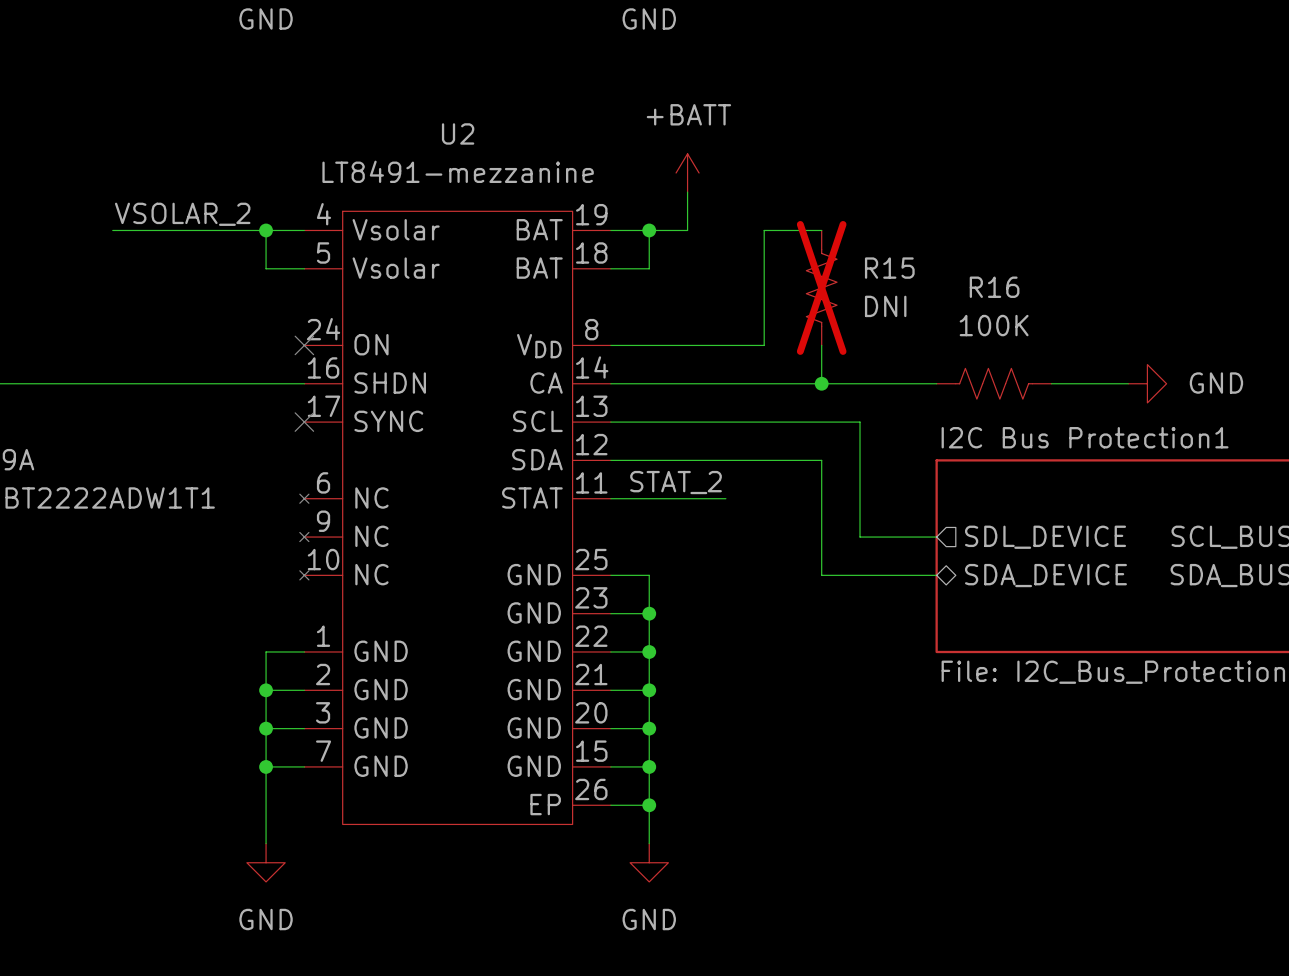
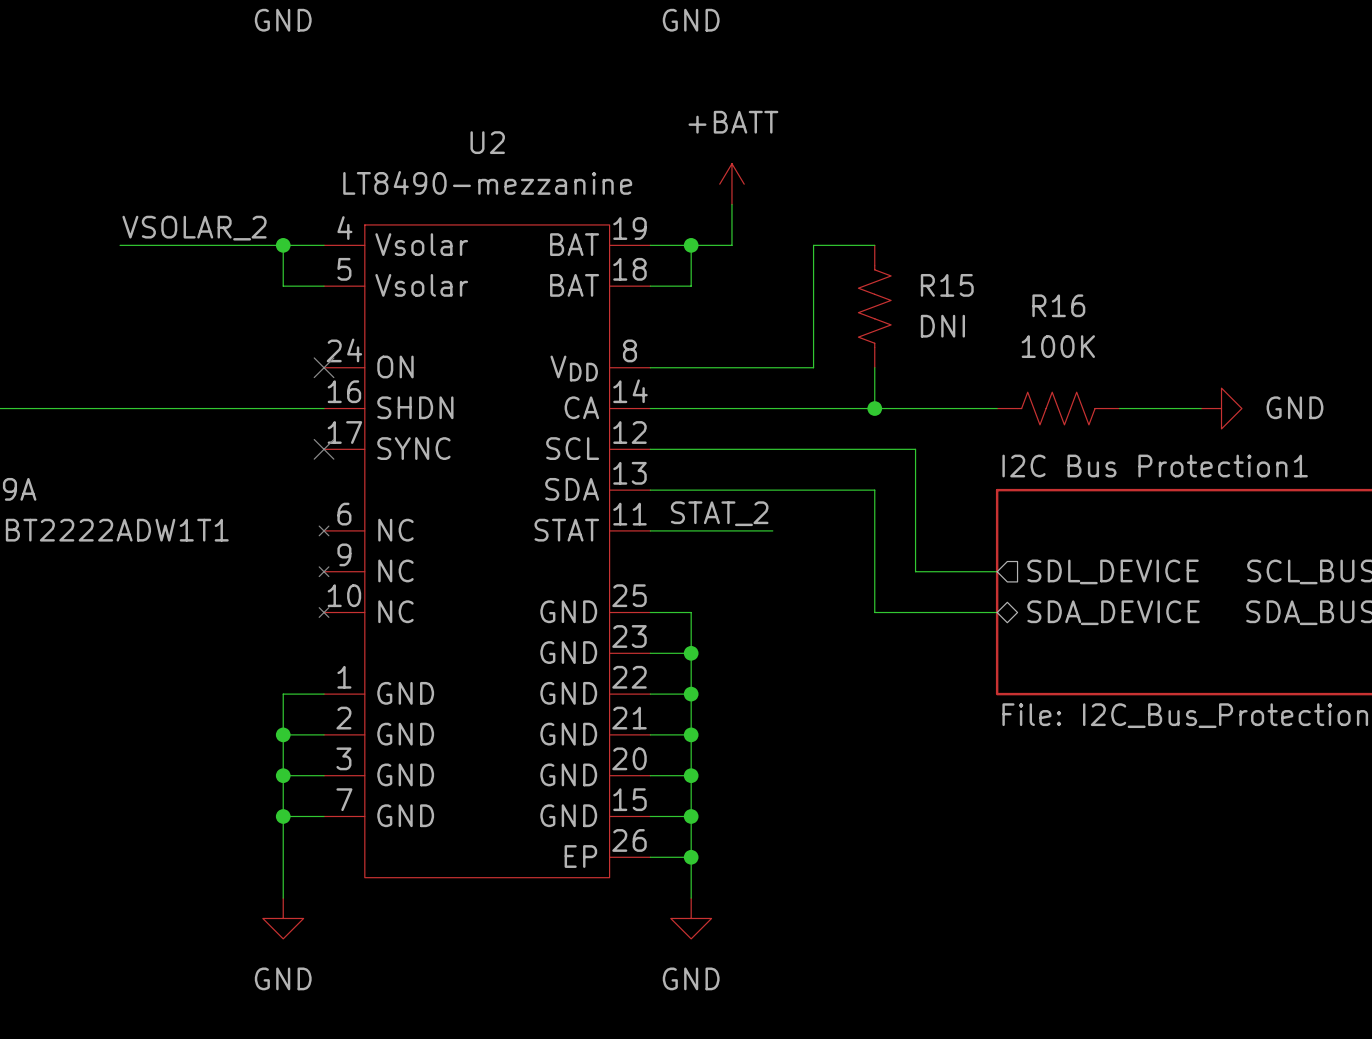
U2 value: LT8491-mezzanine (458, 171) -> LT8490-mezzanine (487, 182)
R15 do-not-place cross: (821, 287) -> none
U2 pin number: 13 (591, 406) -> 12 (629, 432)
U2 pin number: 12 (591, 444) -> 13 (629, 473)

